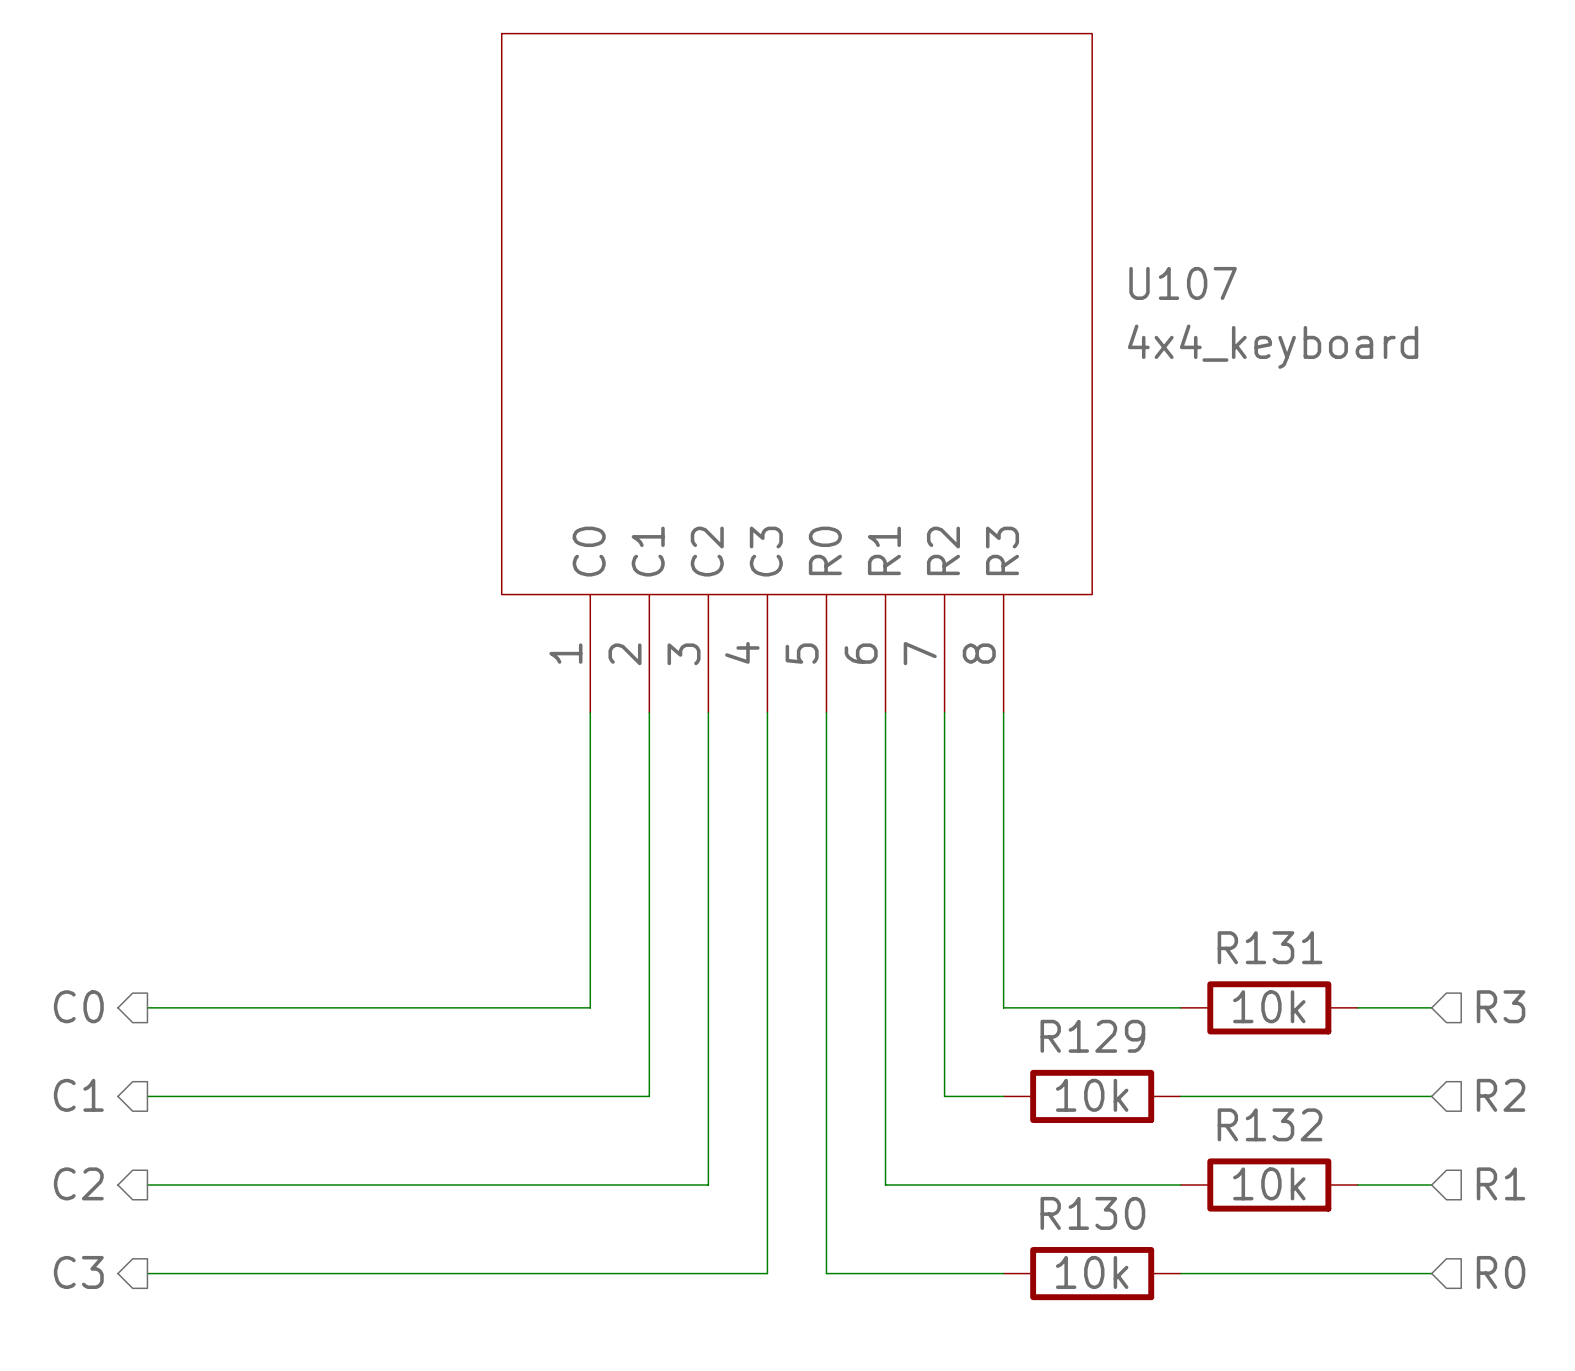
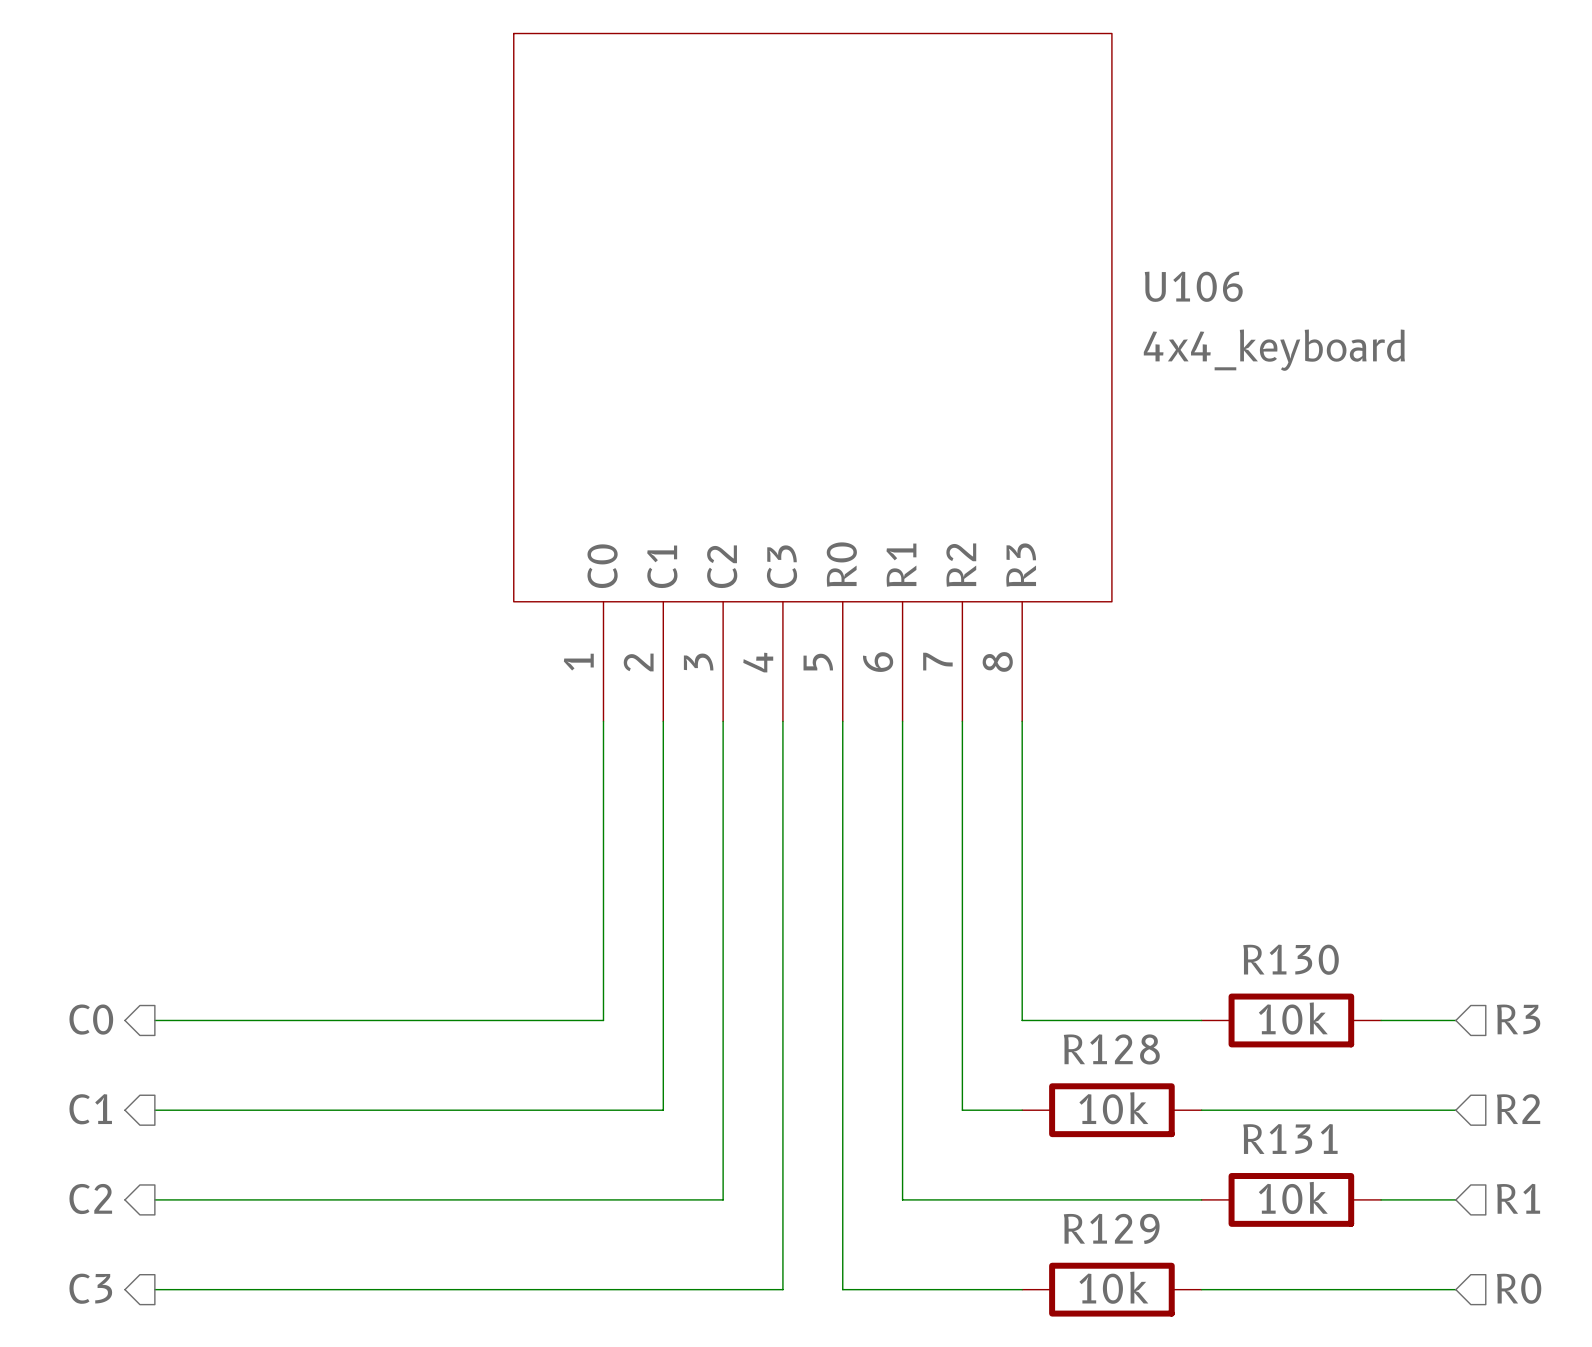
U107 name: U107 (1183, 283) -> U106 (1193, 286)
R131 name: R131 (1270, 947) -> R130 (1291, 959)
R129 name: R129 (1092, 1036) -> R128 (1111, 1049)
R132 name: R132 (1270, 1124) -> R131 (1290, 1138)
R130 name: R130 (1092, 1213) -> R129 (1111, 1228)

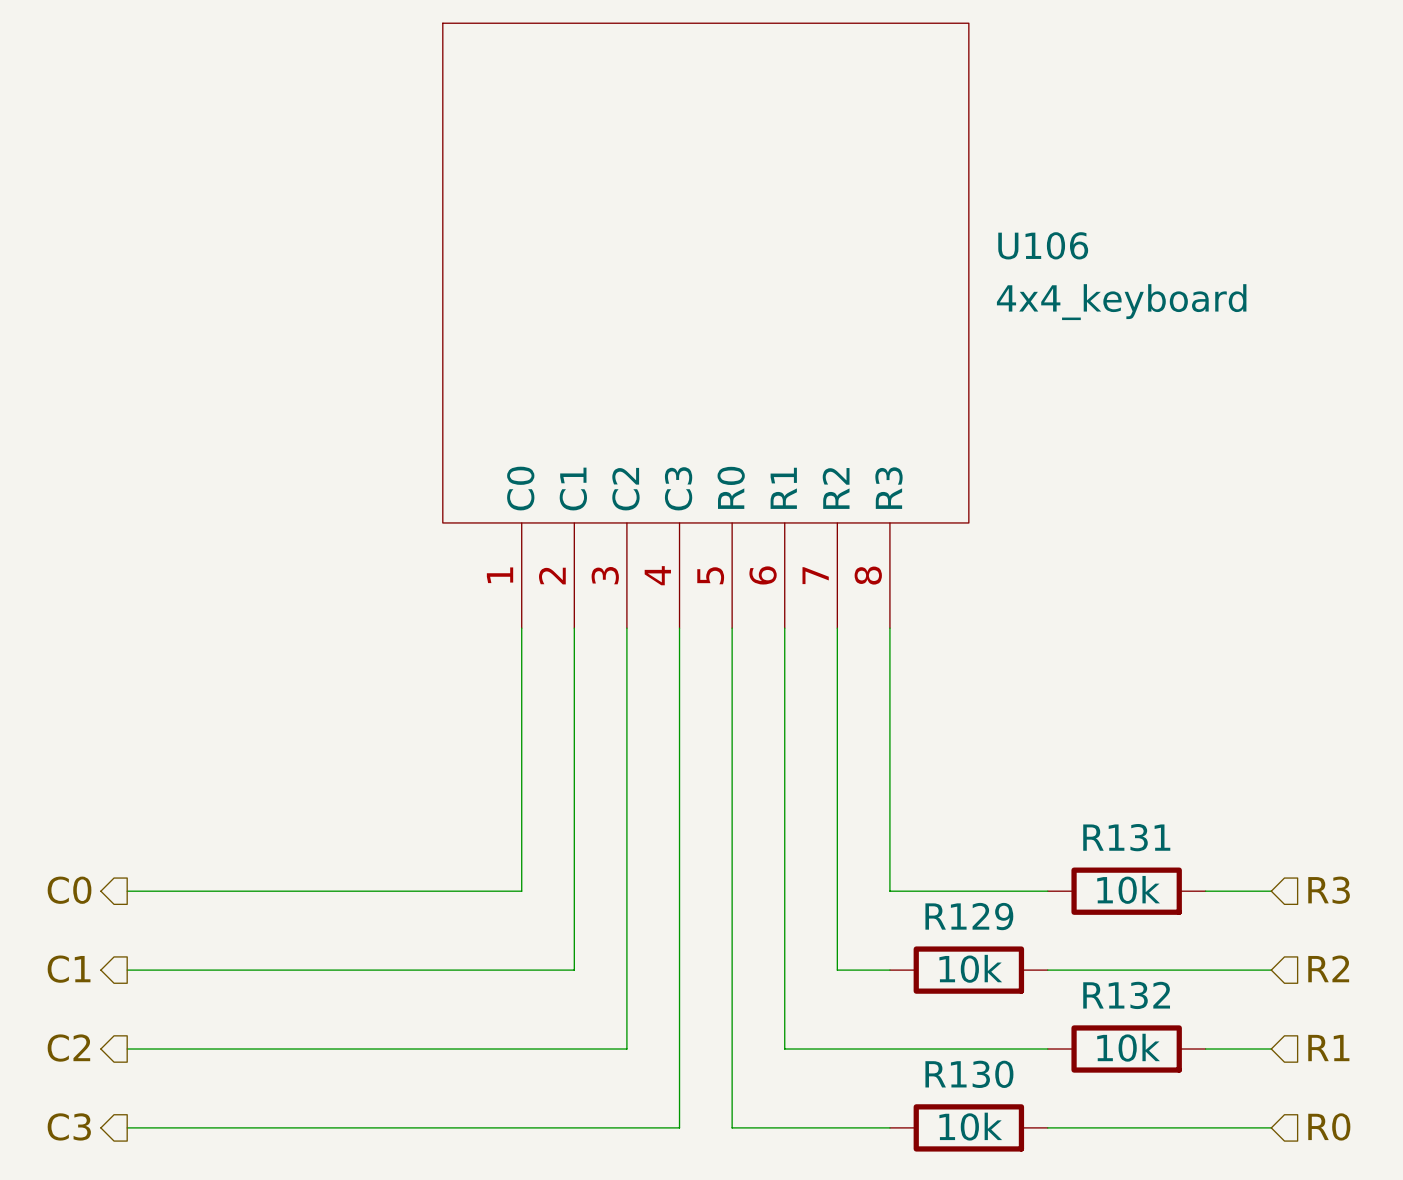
R130 name: R130 (1291, 959) -> R131 (1126, 837)
R128 name: R128 (1111, 1049) -> R129 (969, 916)
R131 name: R131 (1290, 1138) -> R132 (1126, 995)
R129 name: R129 (1111, 1228) -> R130 (969, 1074)

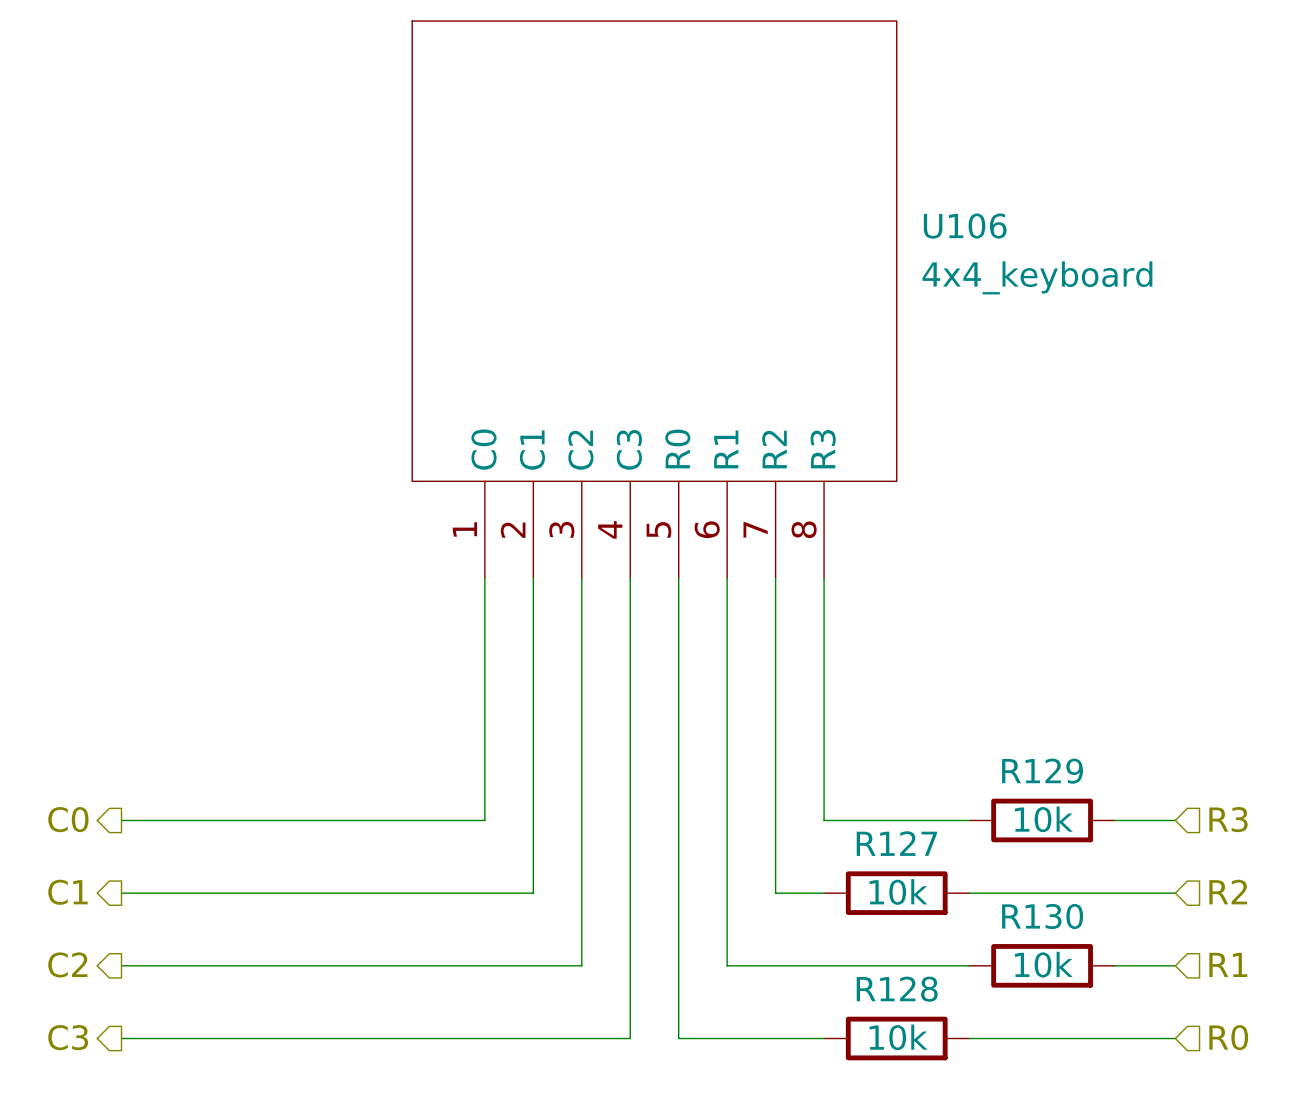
R131 name: R131 (1126, 837) -> R129 (1042, 771)
R129 name: R129 (969, 916) -> R127 (896, 843)
R132 name: R132 (1126, 995) -> R130 (1042, 916)
R130 name: R130 (969, 1074) -> R128 (897, 989)

